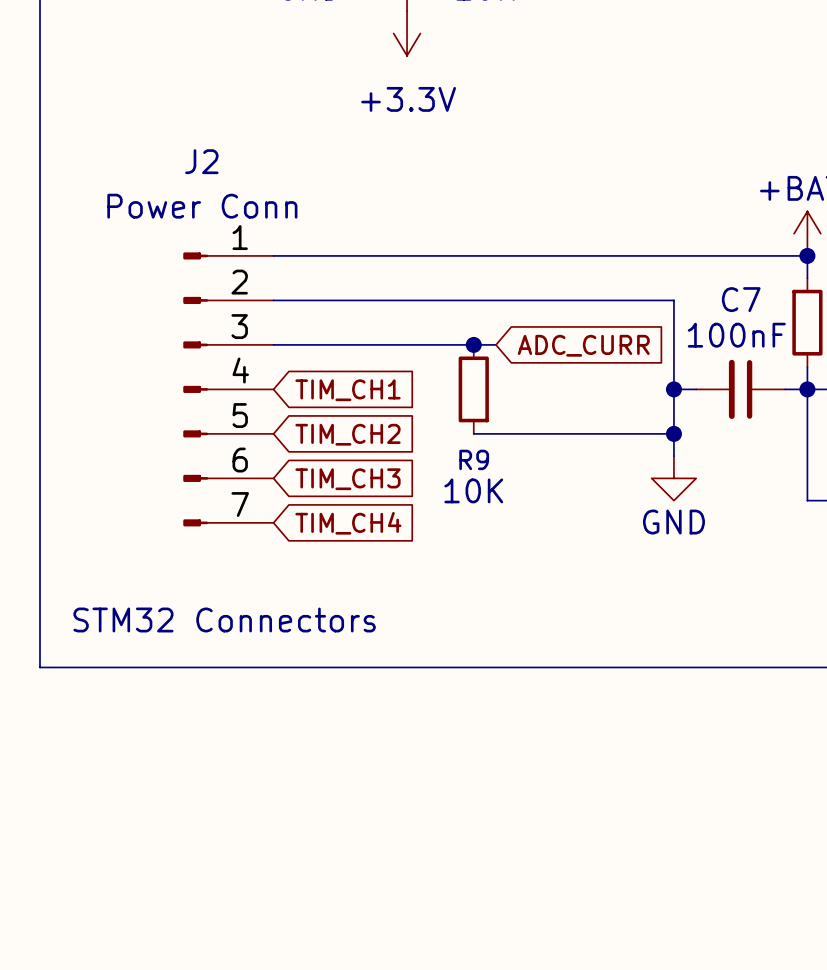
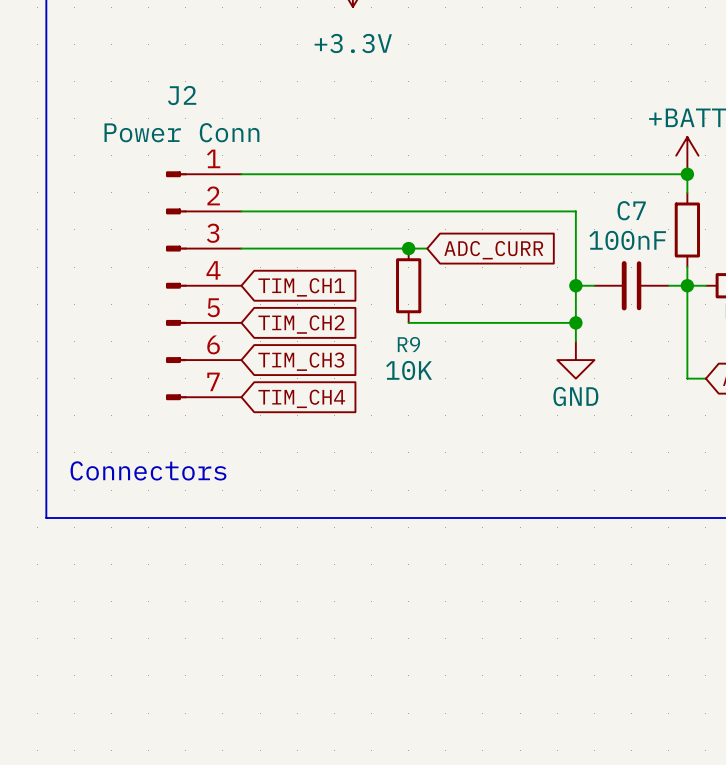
text: STM32 Connectors (224, 619) -> Connectors (148, 470)

